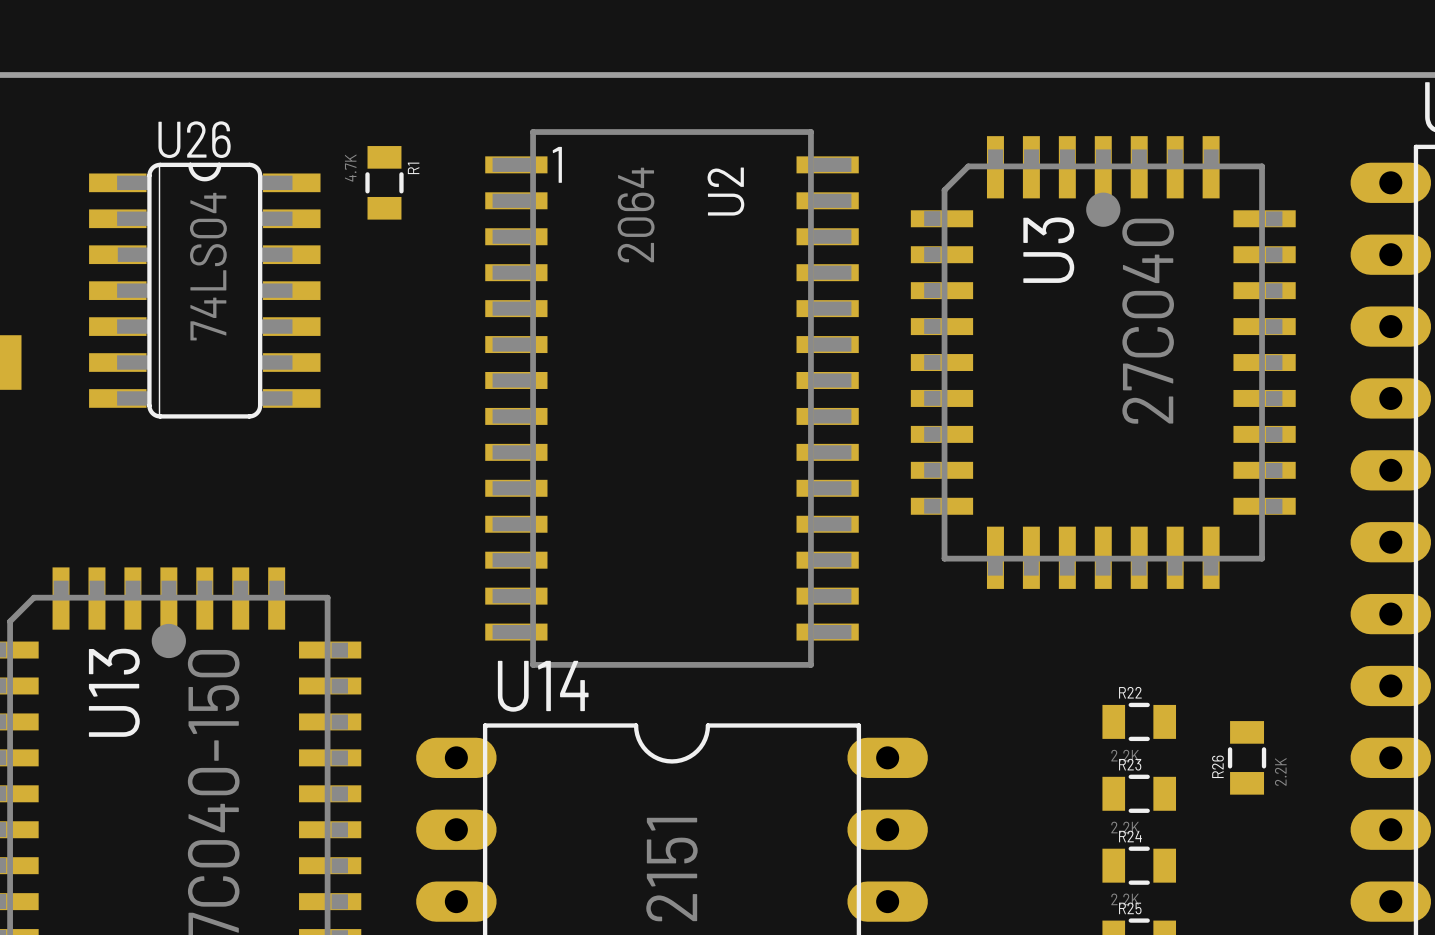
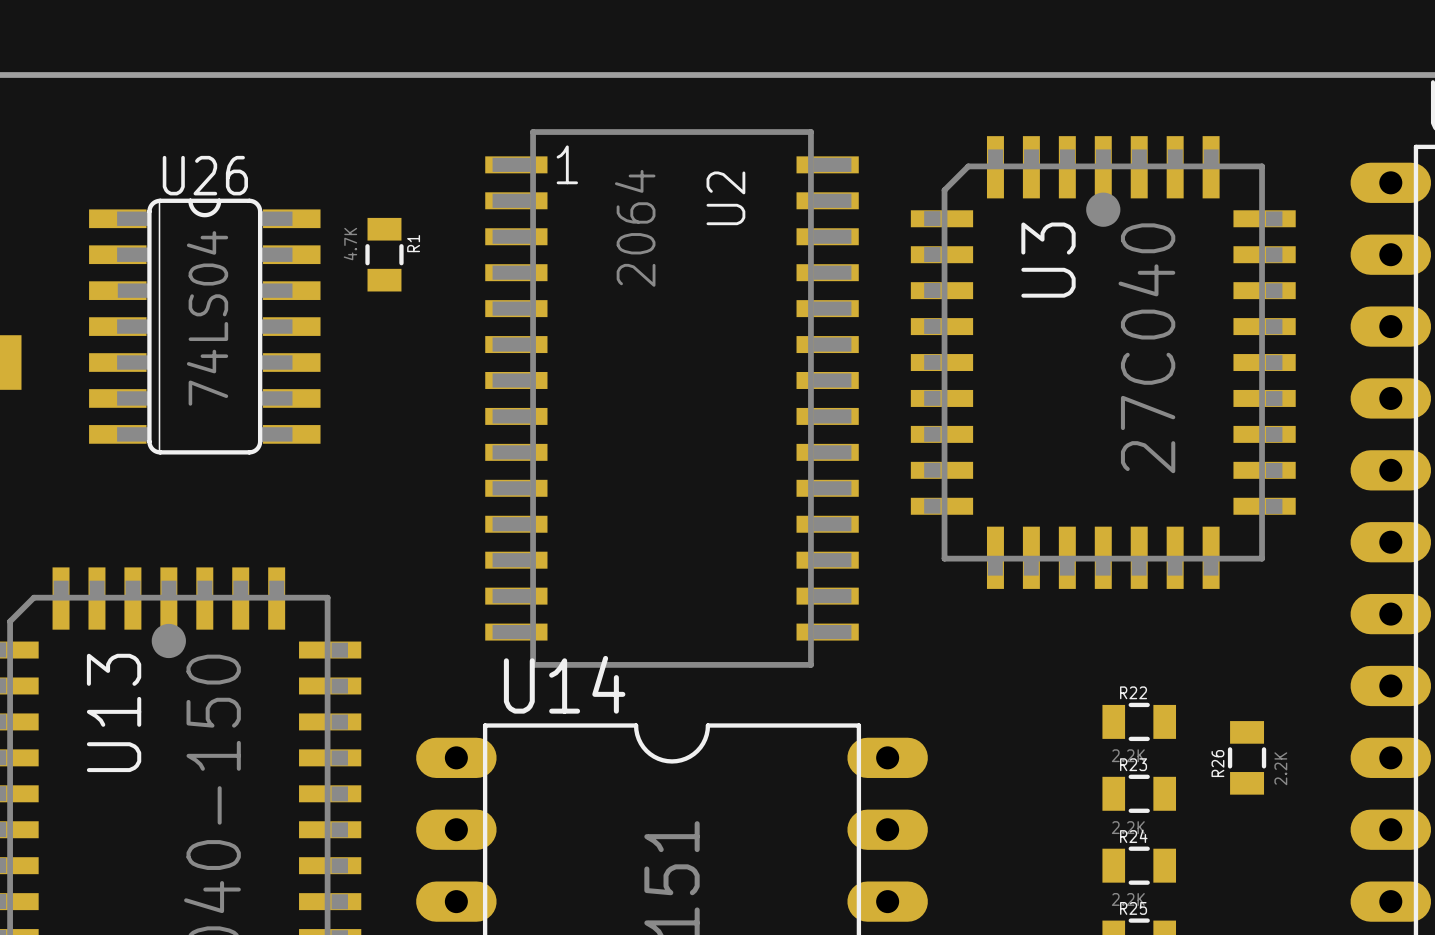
R1 position: (384, 182) -> (384, 254)
U26 position: (204, 290) -> (204, 326)

